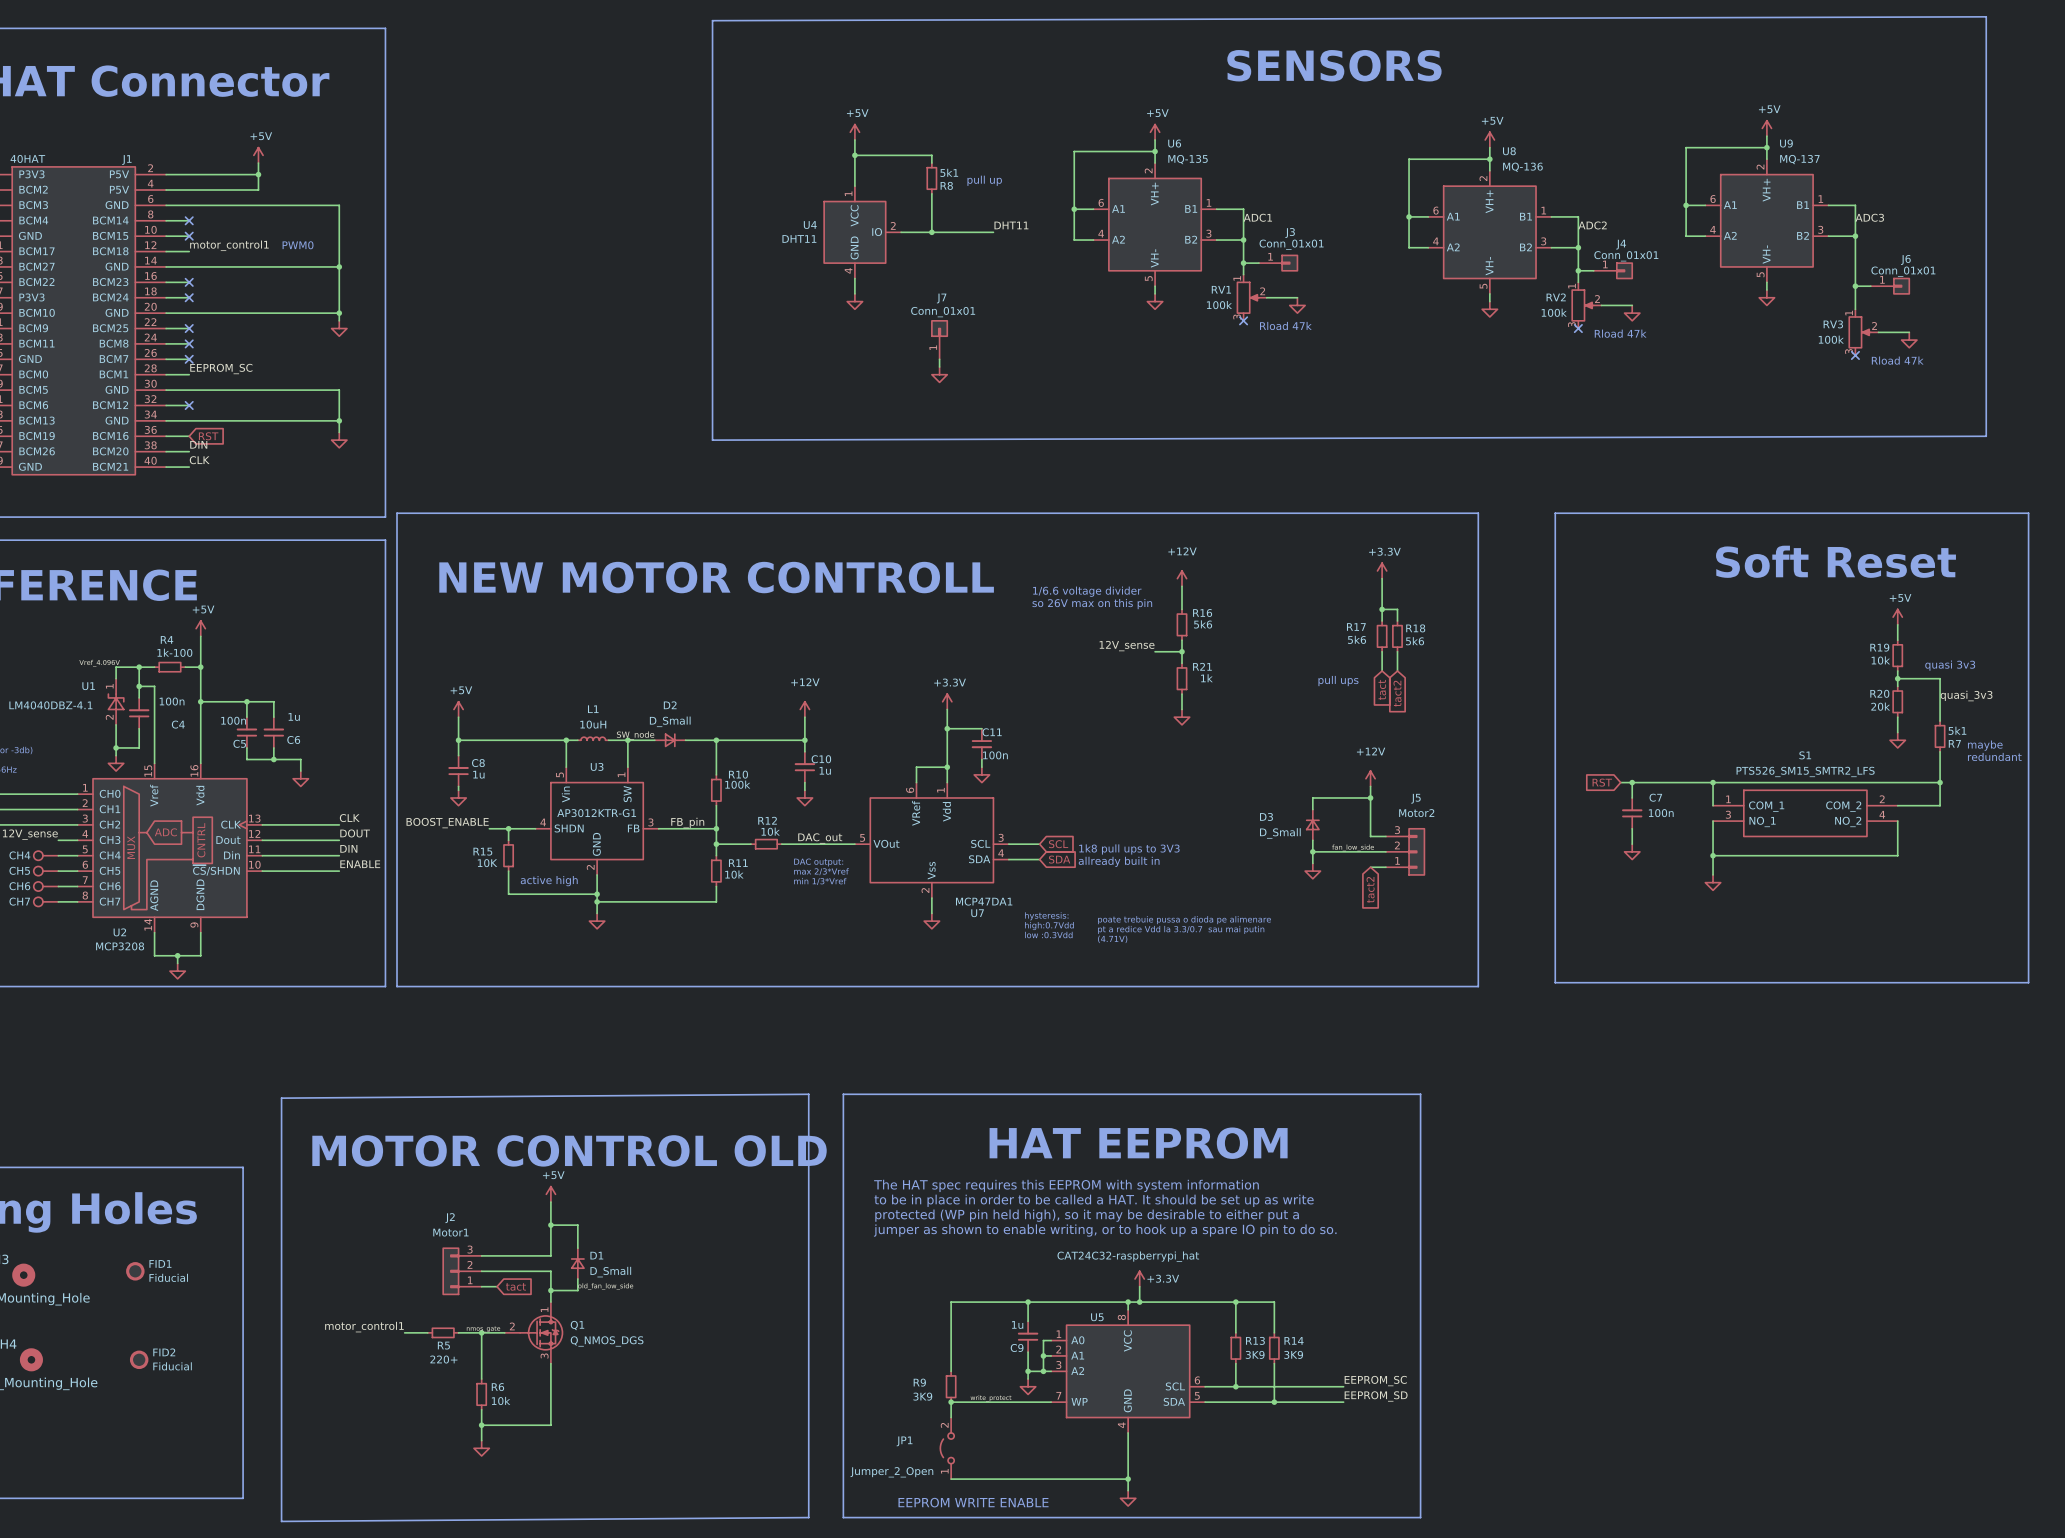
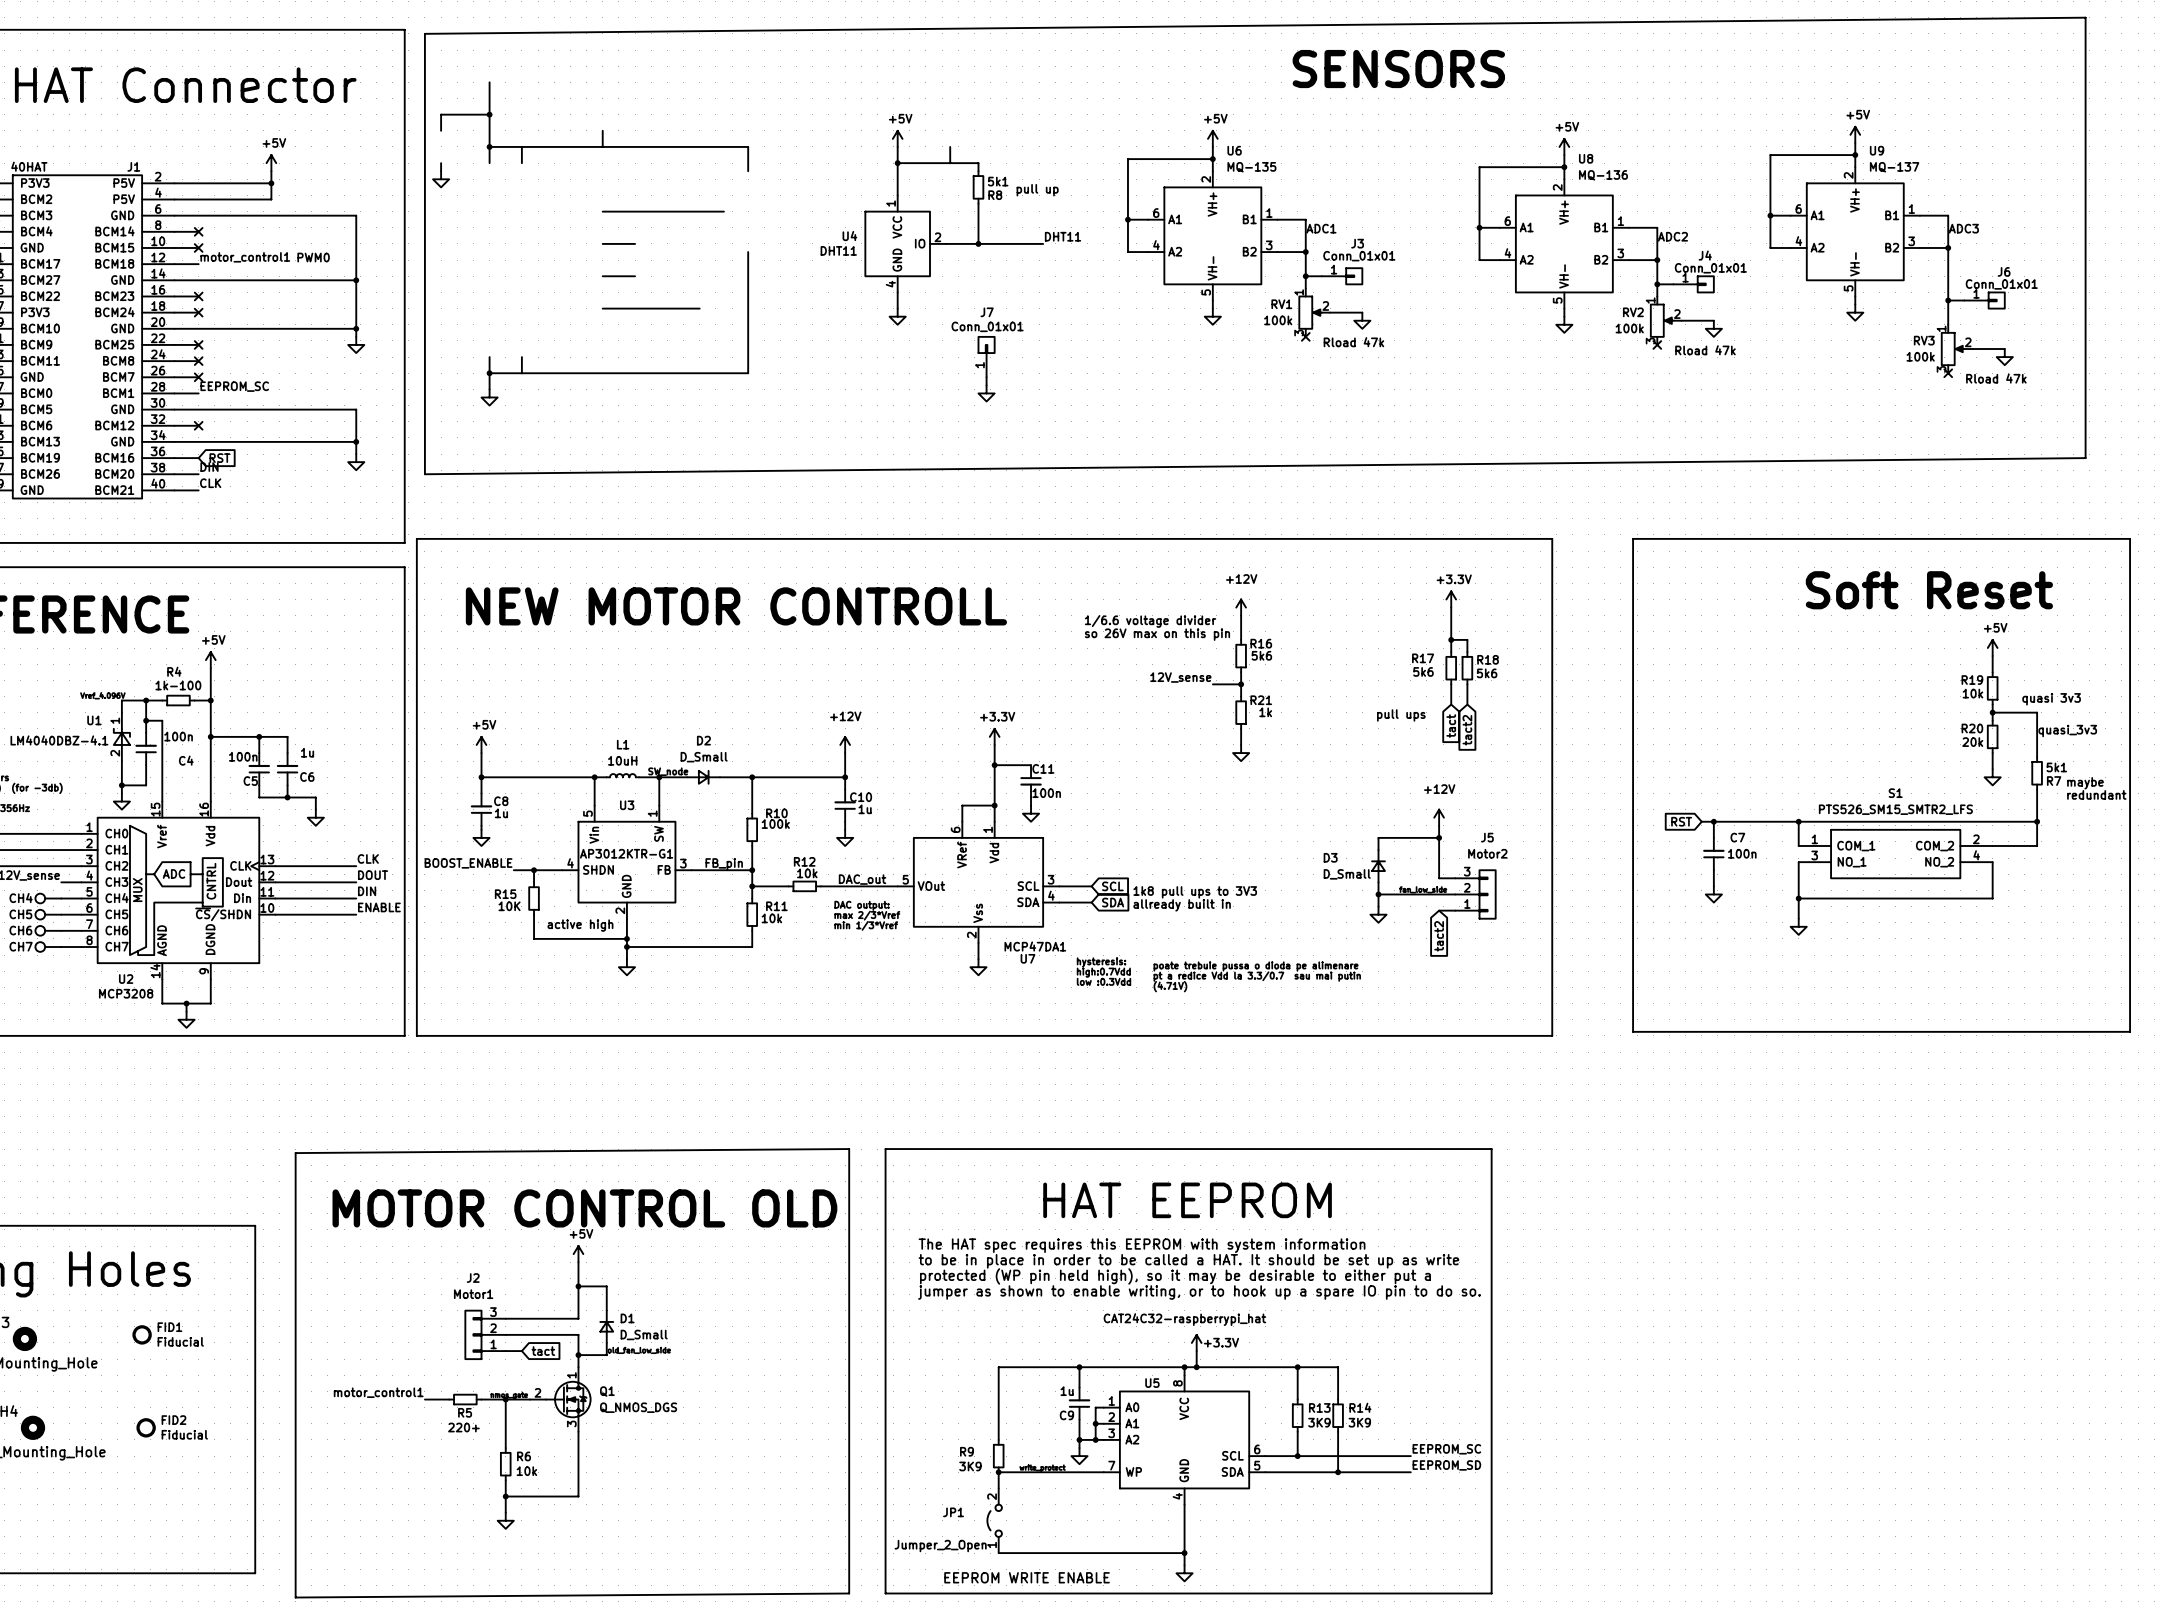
line: (1986, 16) (712, 20) (712, 440) (1986, 436) -> (2085, 17) (424, 33) (424, 474) (2085, 458)
wire: none -> (489, 82) (489, 163)
wire: none -> (489, 114) (441, 114) (441, 130)
junction: none -> (489, 114)
wire: none -> (602, 130) (602, 146)
wire: none -> (489, 146) (748, 146) (748, 171)
junction: none -> (489, 146)
wire: none -> (521, 146) (521, 163)
wire: none -> (950, 146) (950, 163)
wire: none -> (441, 163) (441, 171)
power symbol: none -> (441, 179)
wire: none -> (602, 211) (723, 211)
wire: none -> (602, 243) (635, 243)
wire: none -> (748, 252) (748, 373) (489, 373)
wire: none -> (602, 276) (635, 276)
wire: none -> (602, 308) (699, 308)
wire: none -> (489, 357) (489, 389)
wire: none -> (521, 357) (521, 373)
junction: none -> (489, 373)
power symbol: none -> (489, 397)

